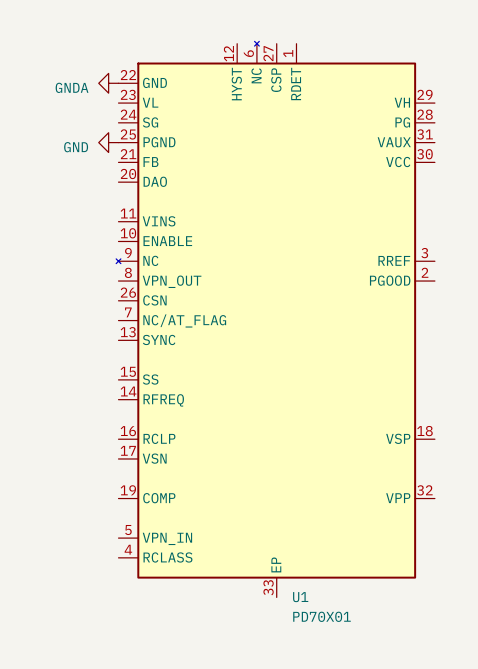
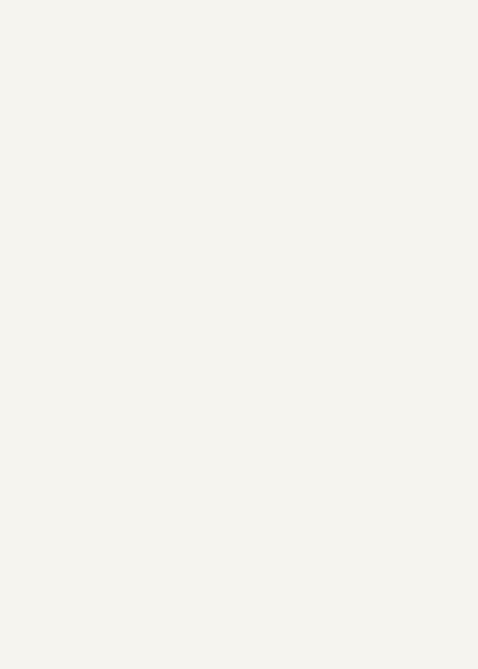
power symbol: GNDA (108, 83) -> none
power symbol: GND (108, 142) -> none
U1: PD70X01 (275, 319) -> none

